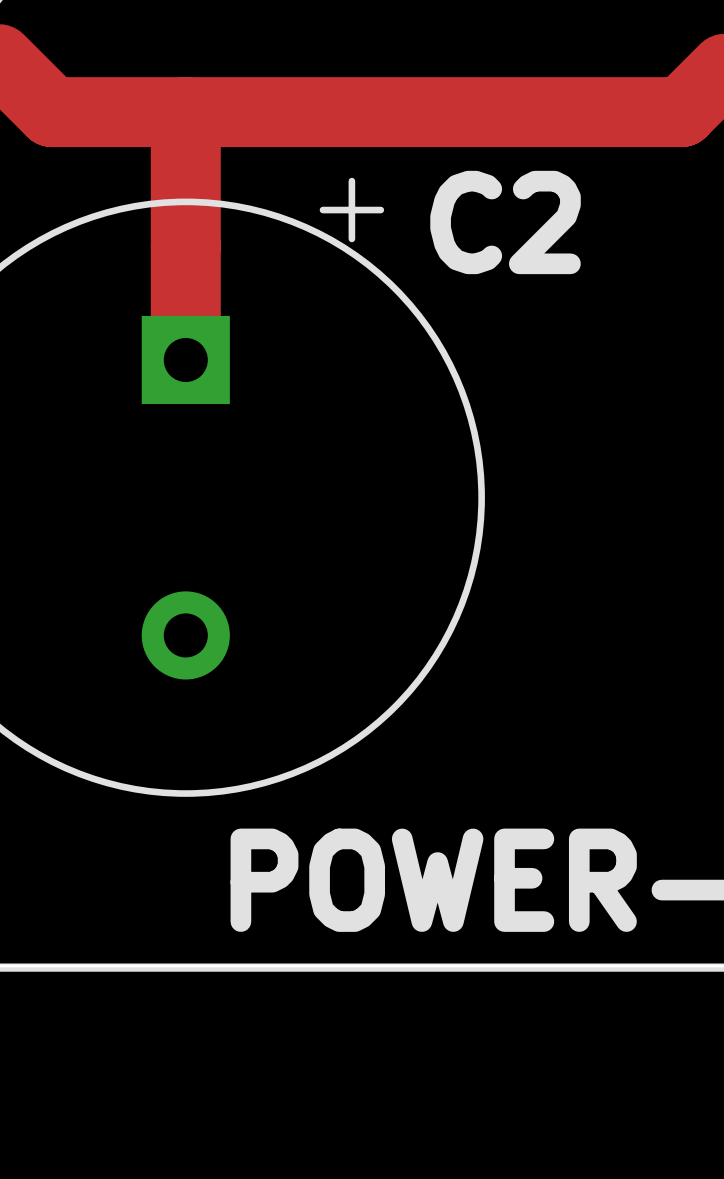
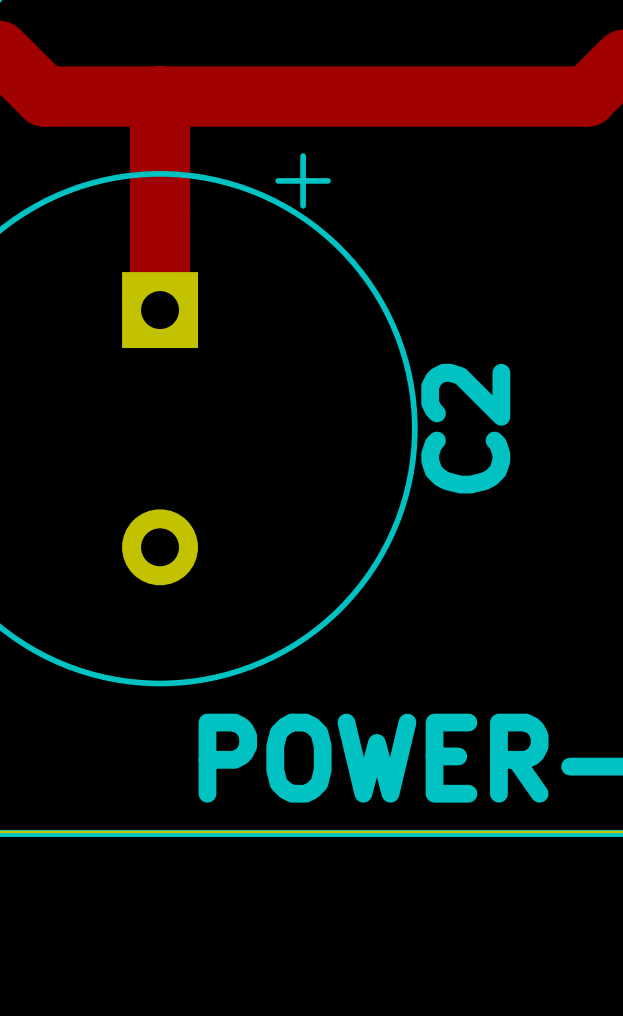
C2 name rotation: 0° (505, 222) -> 90° counterclockwise (465, 428)
C2 name position: C2 (505, 222) -> C2 (465, 428)

